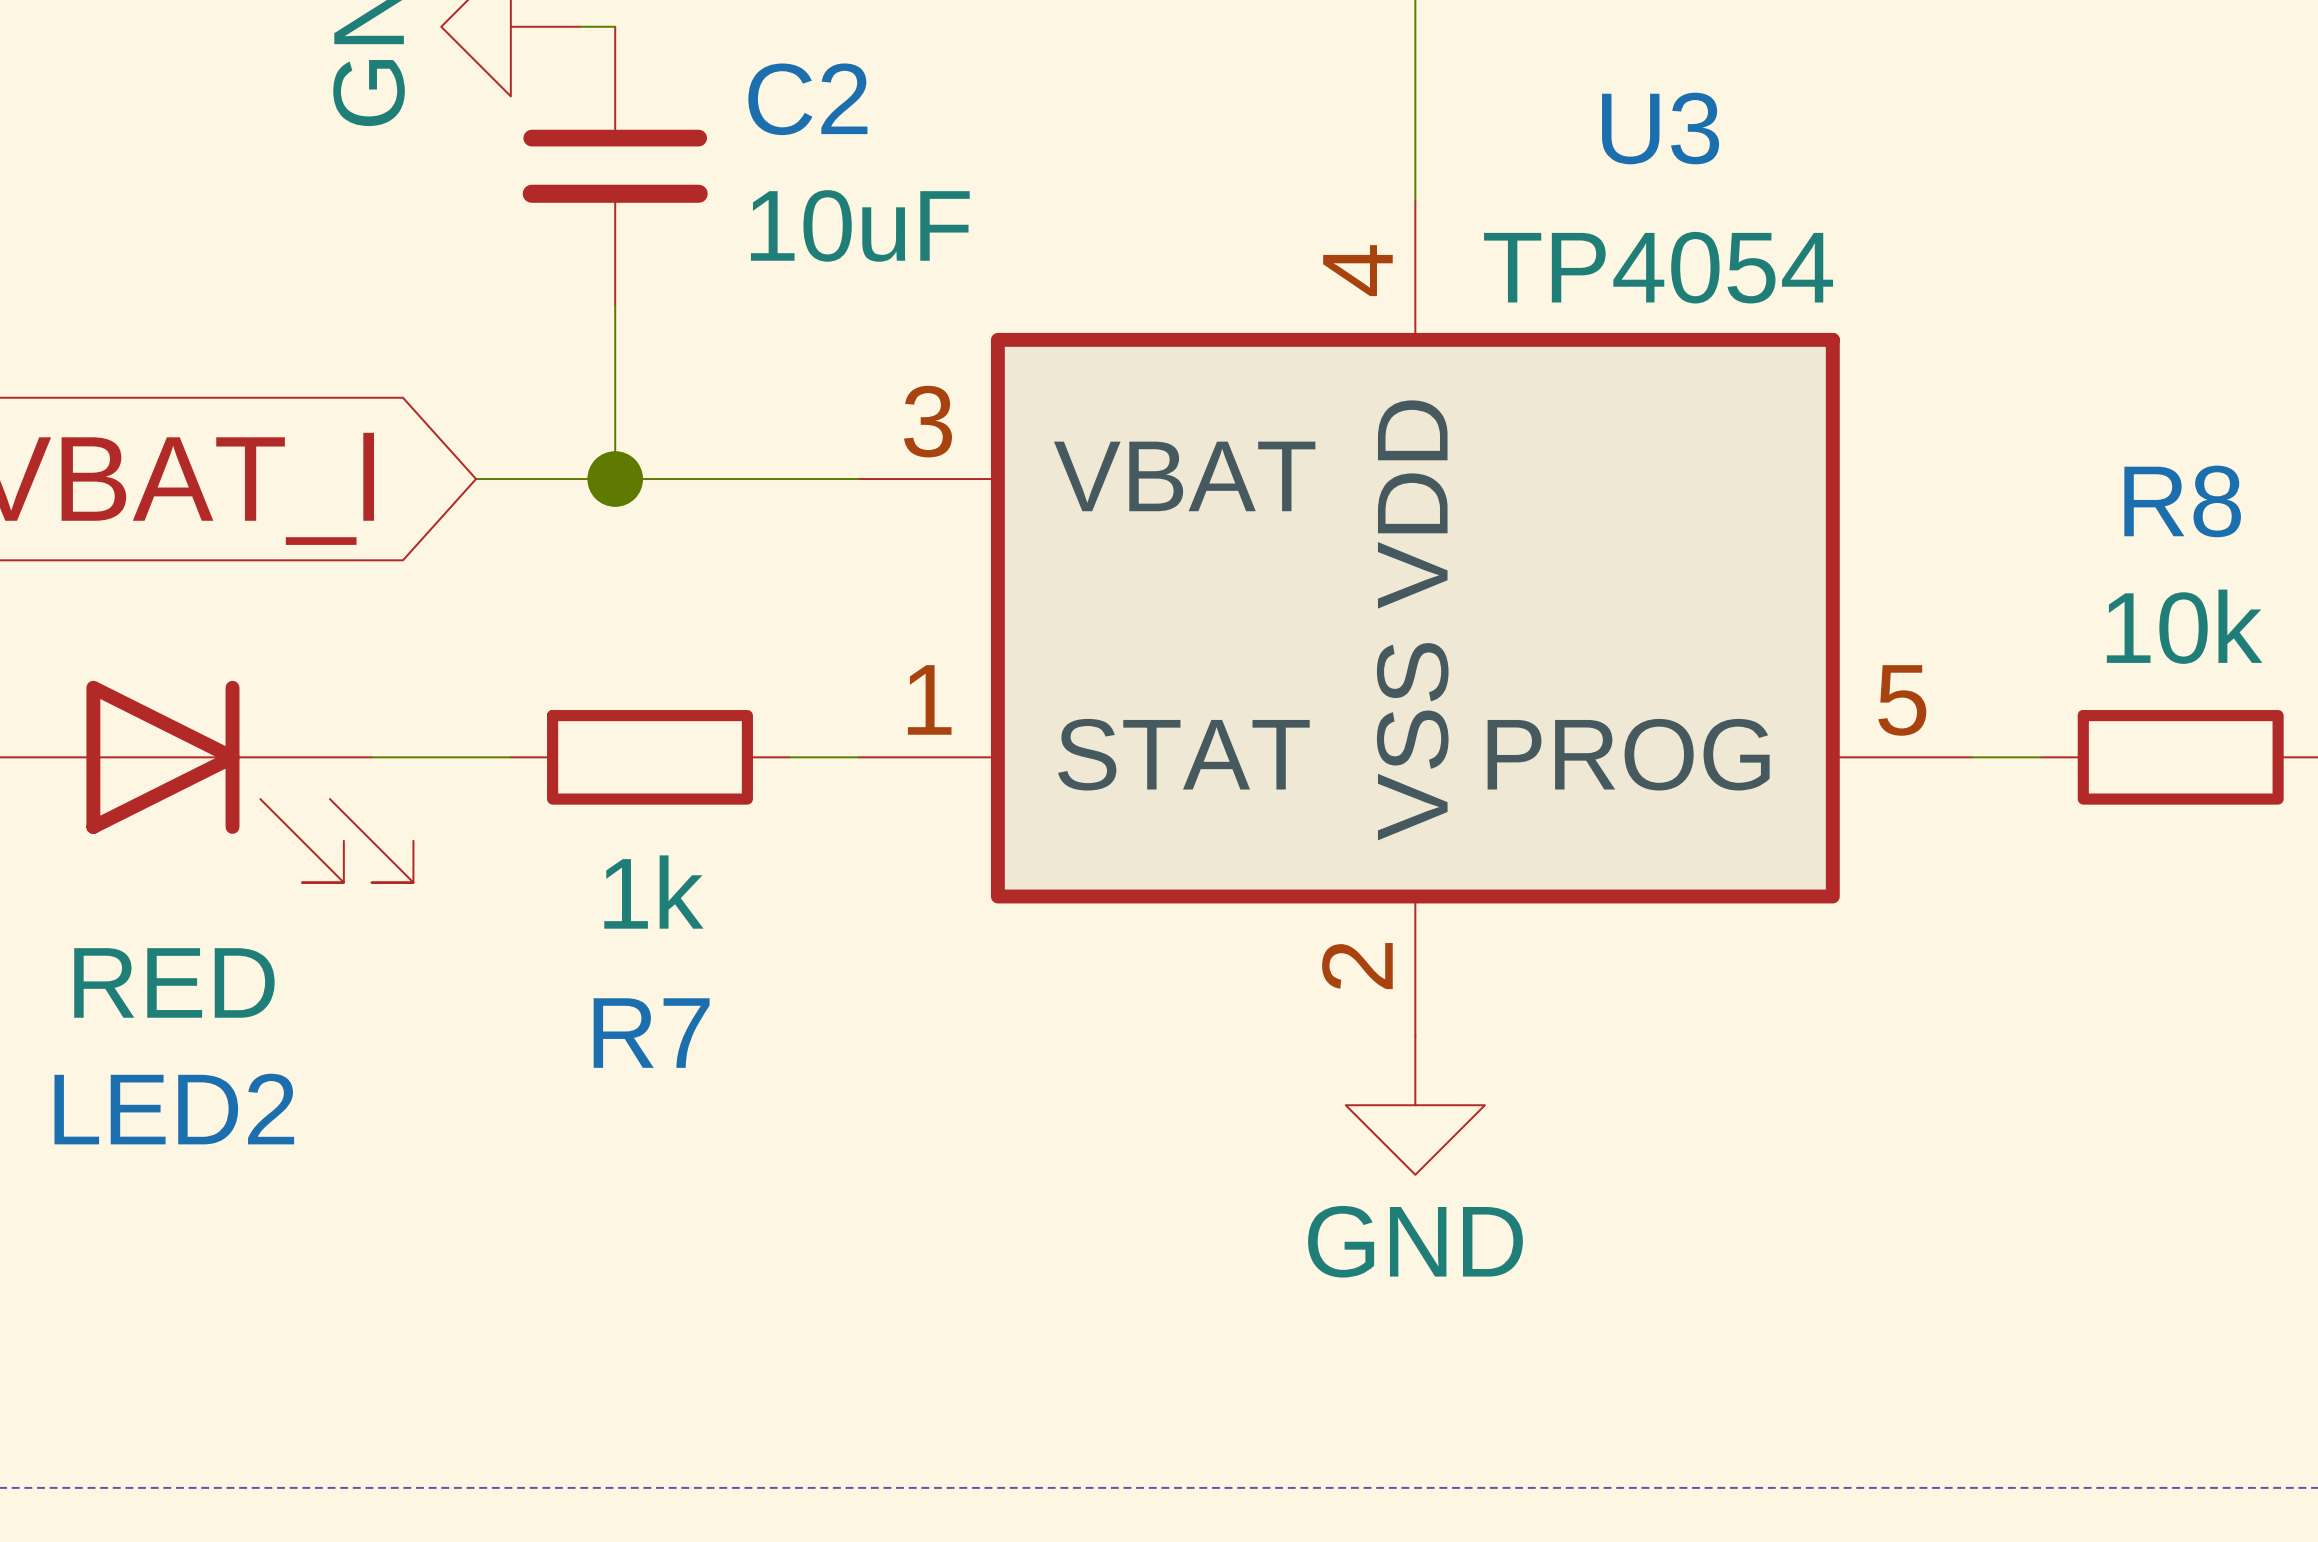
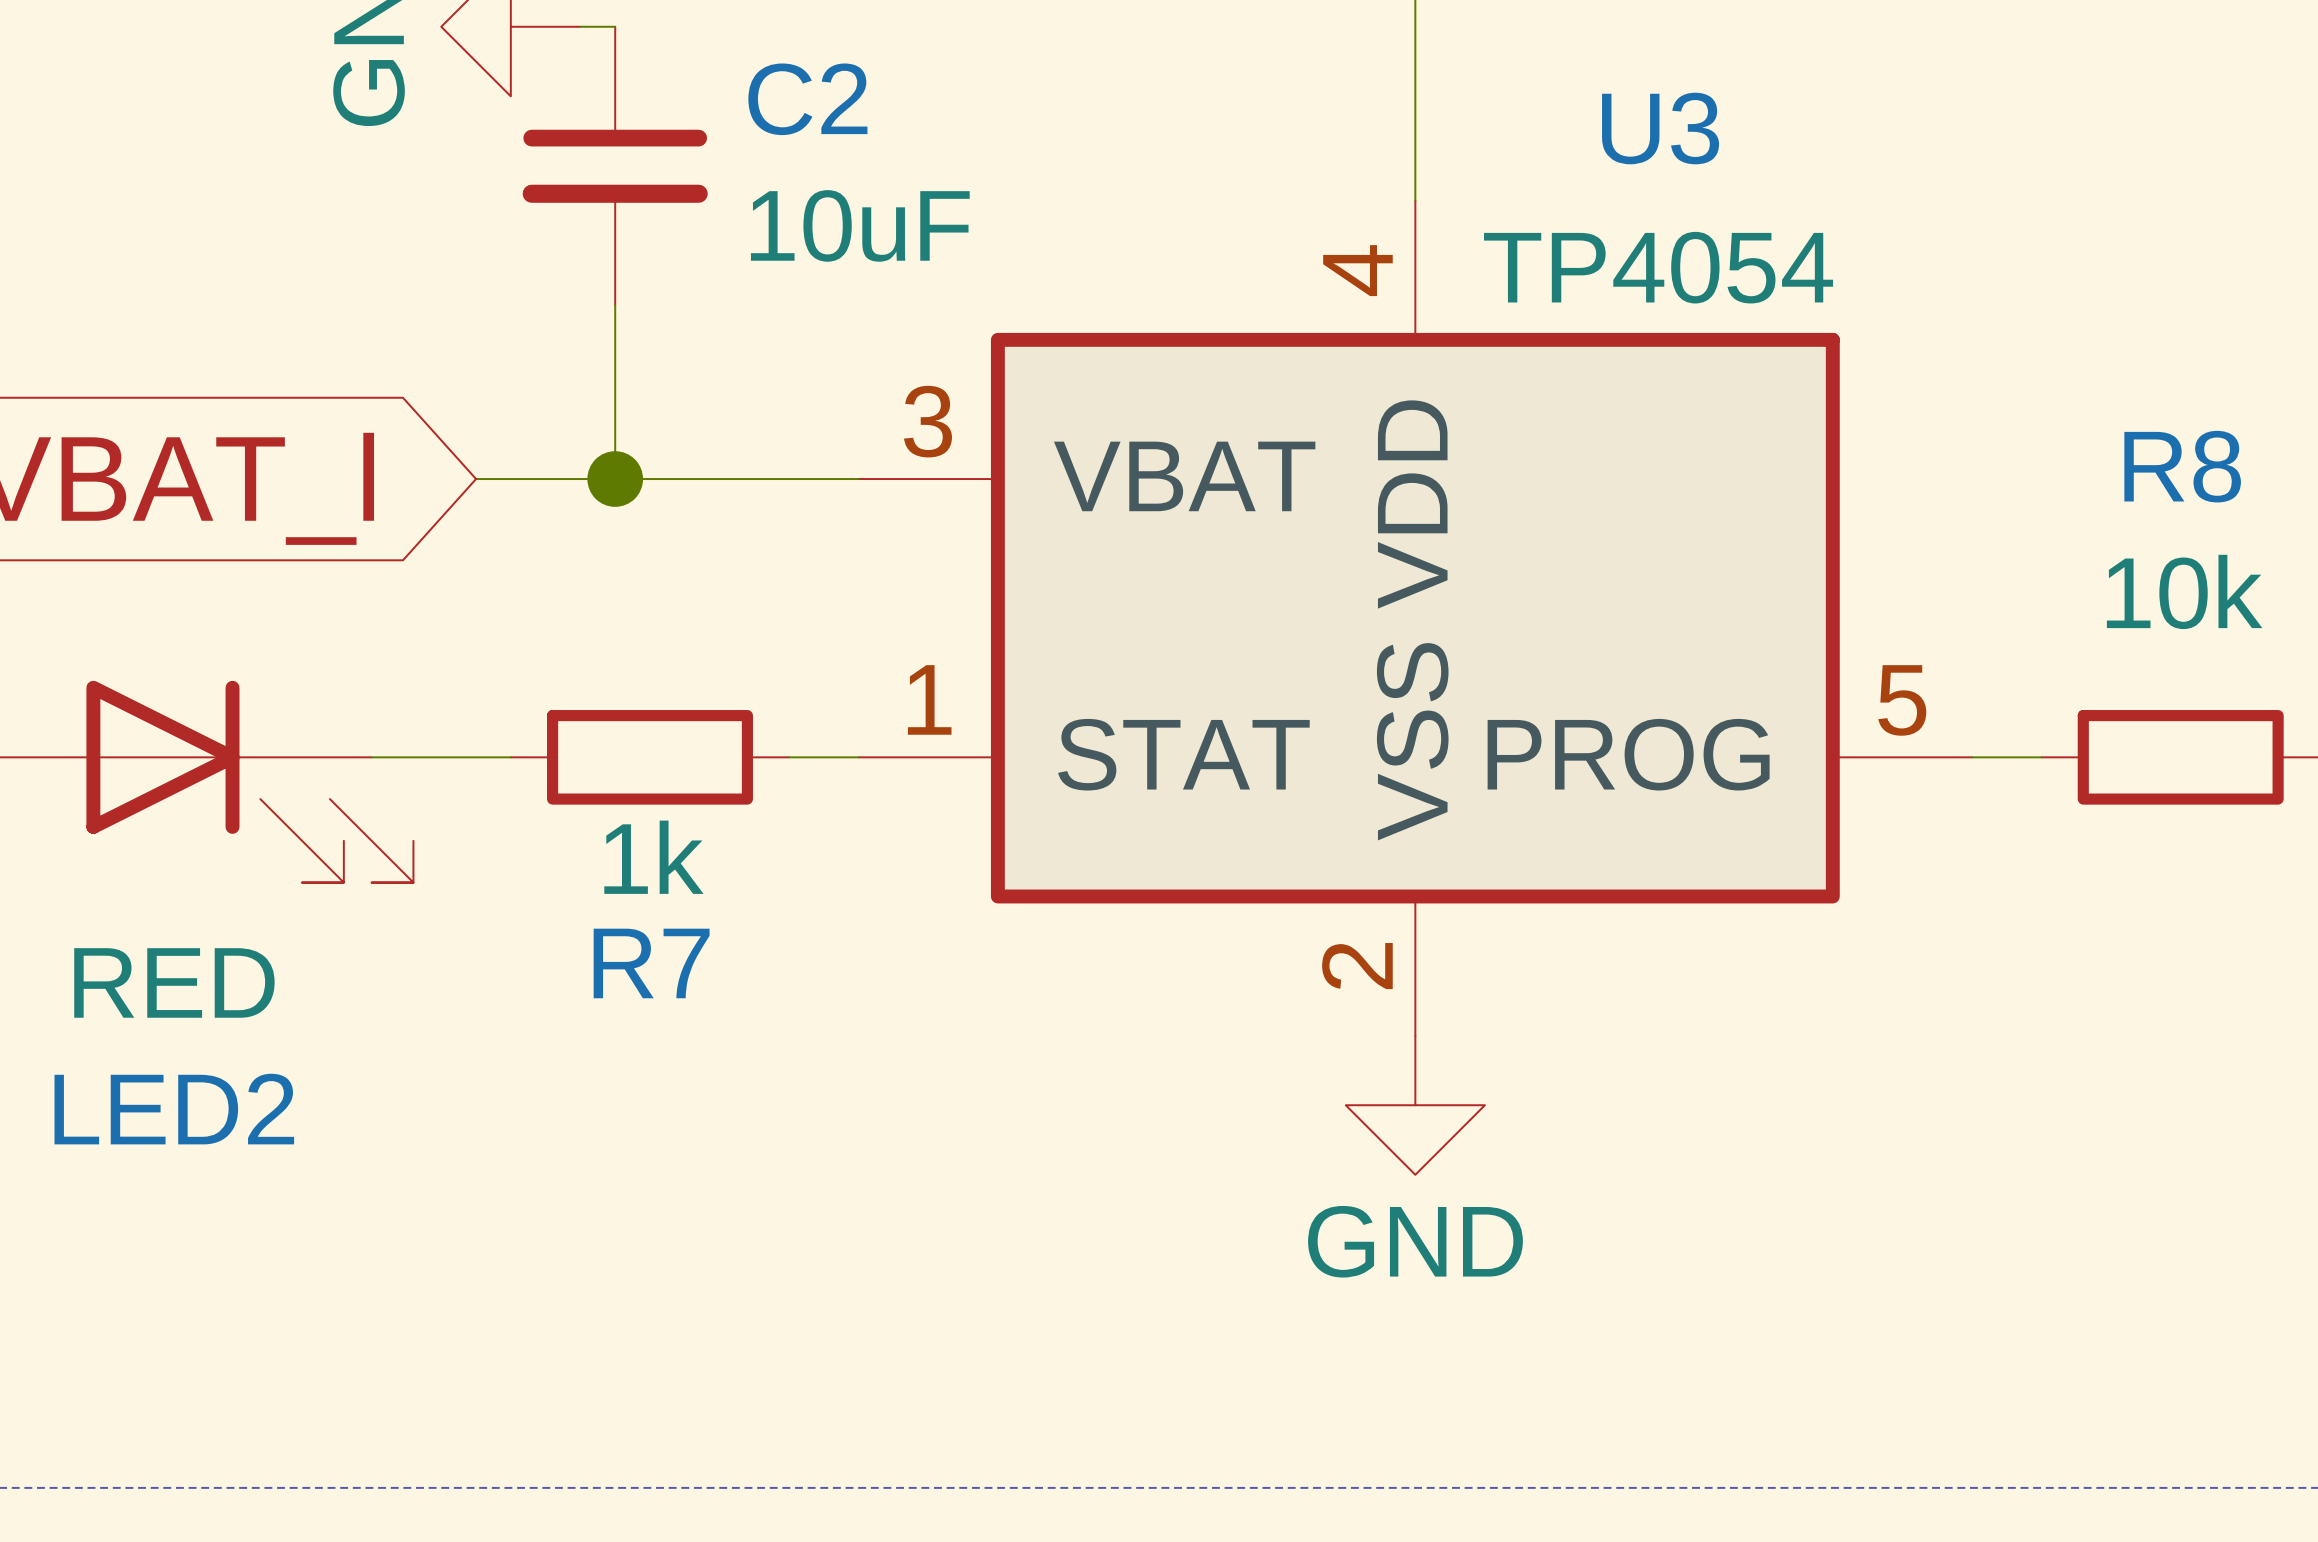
R8 name position: R8 (2182, 501) -> R8 (2182, 466)
R8 value position: 10k (2184, 626) -> 10k (2184, 591)
R7 value position: 1k (653, 892) -> 1k (653, 857)
R7 name position: R7 (651, 1033) -> R7 (651, 963)

